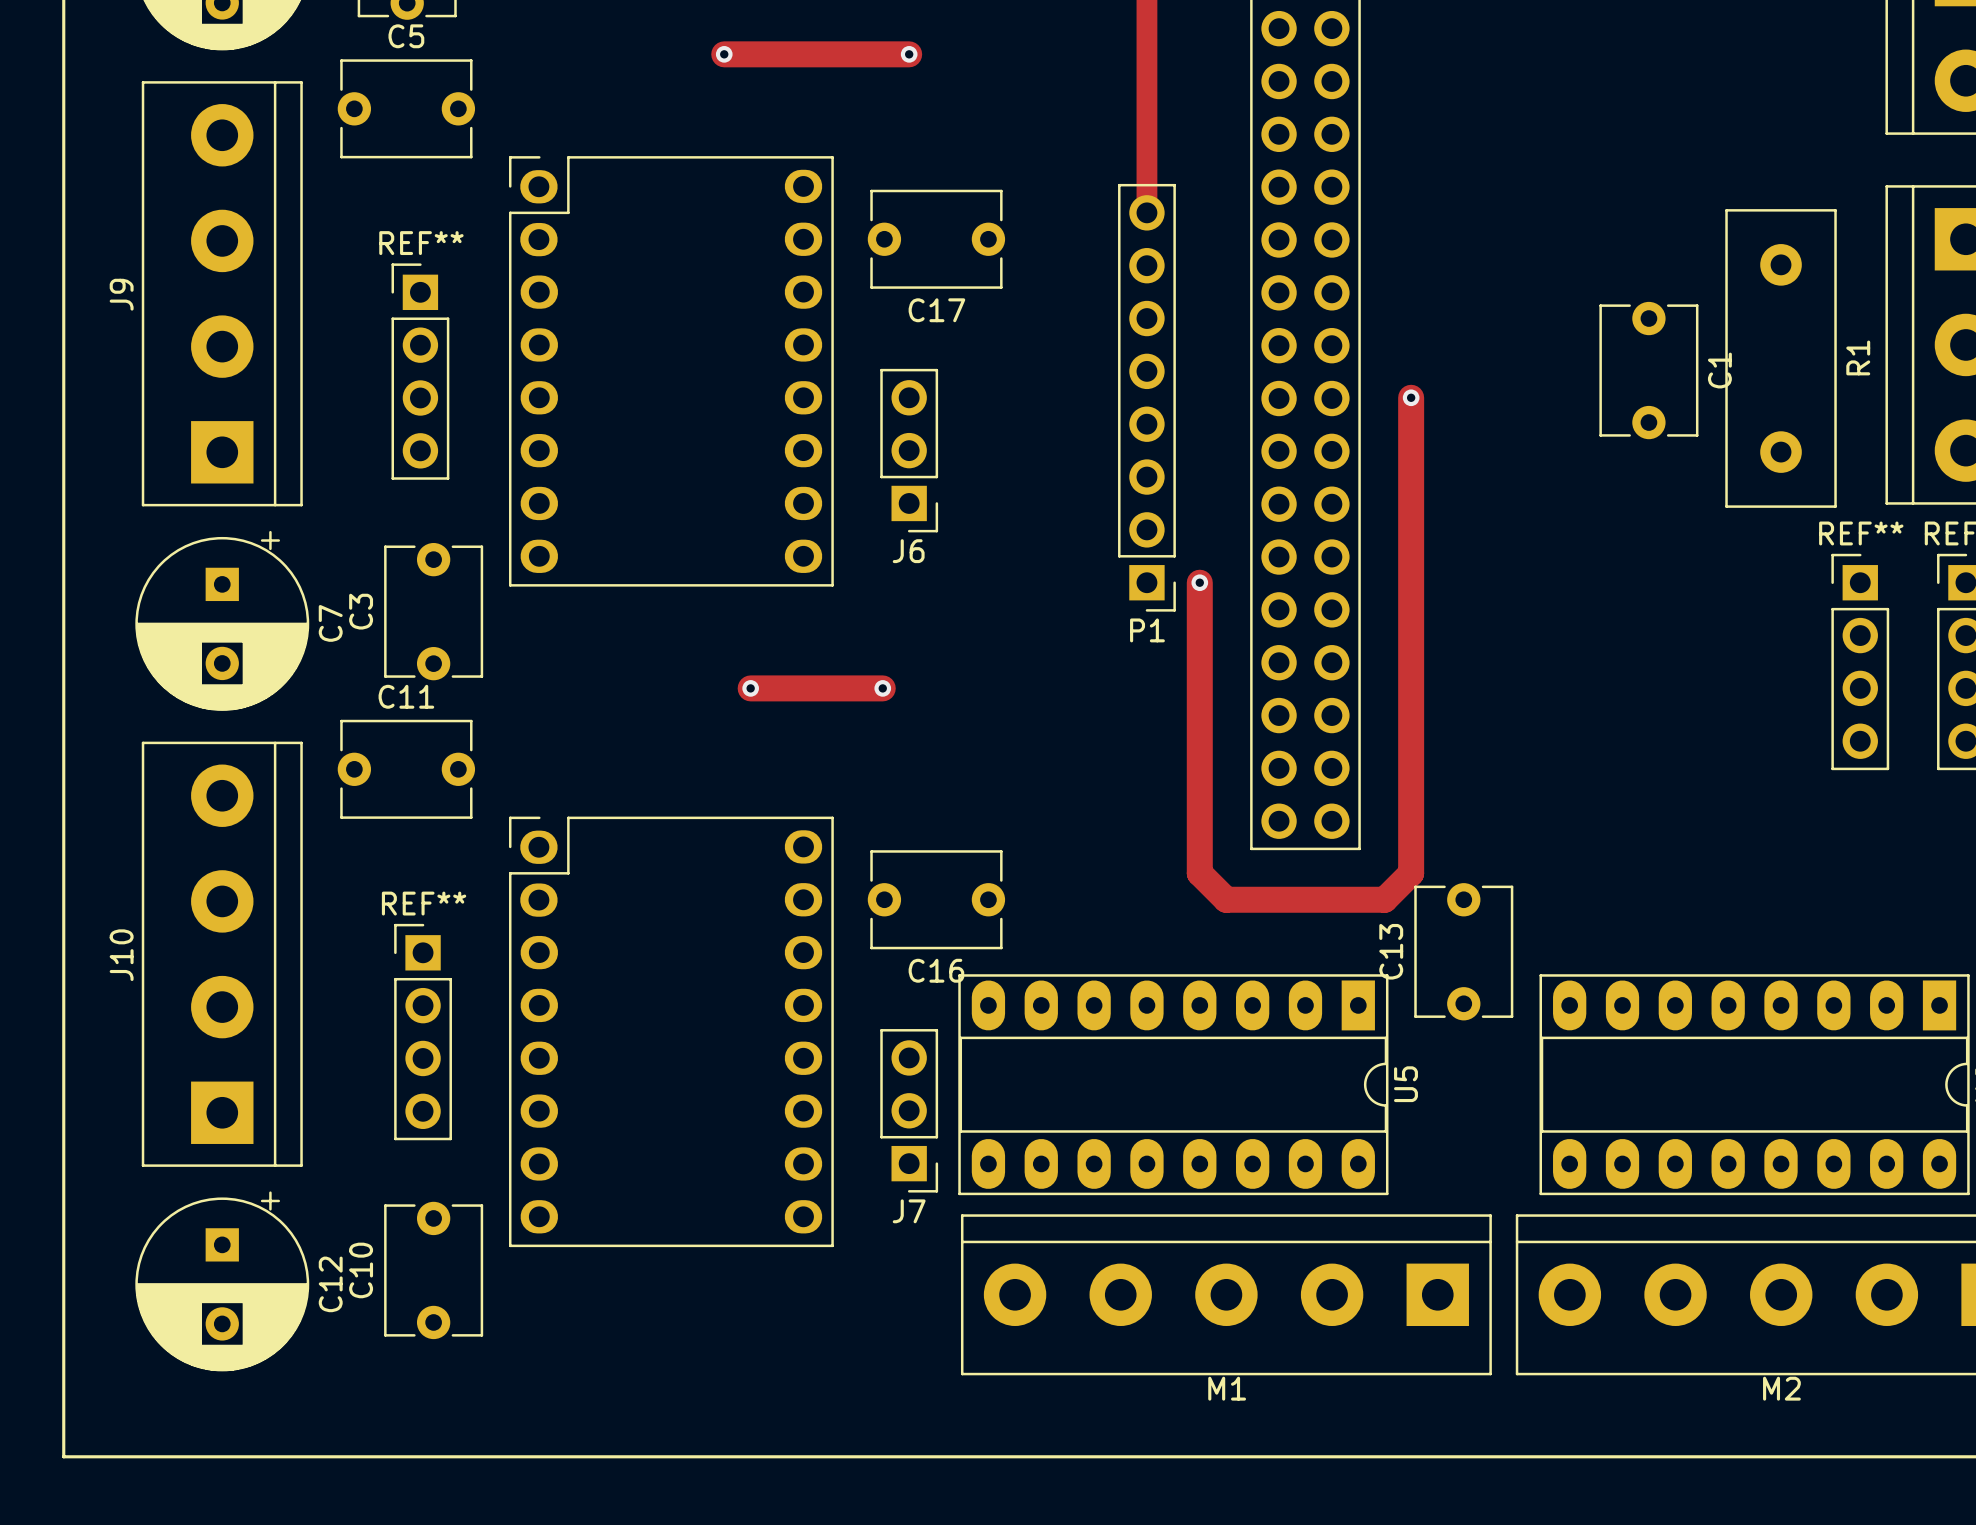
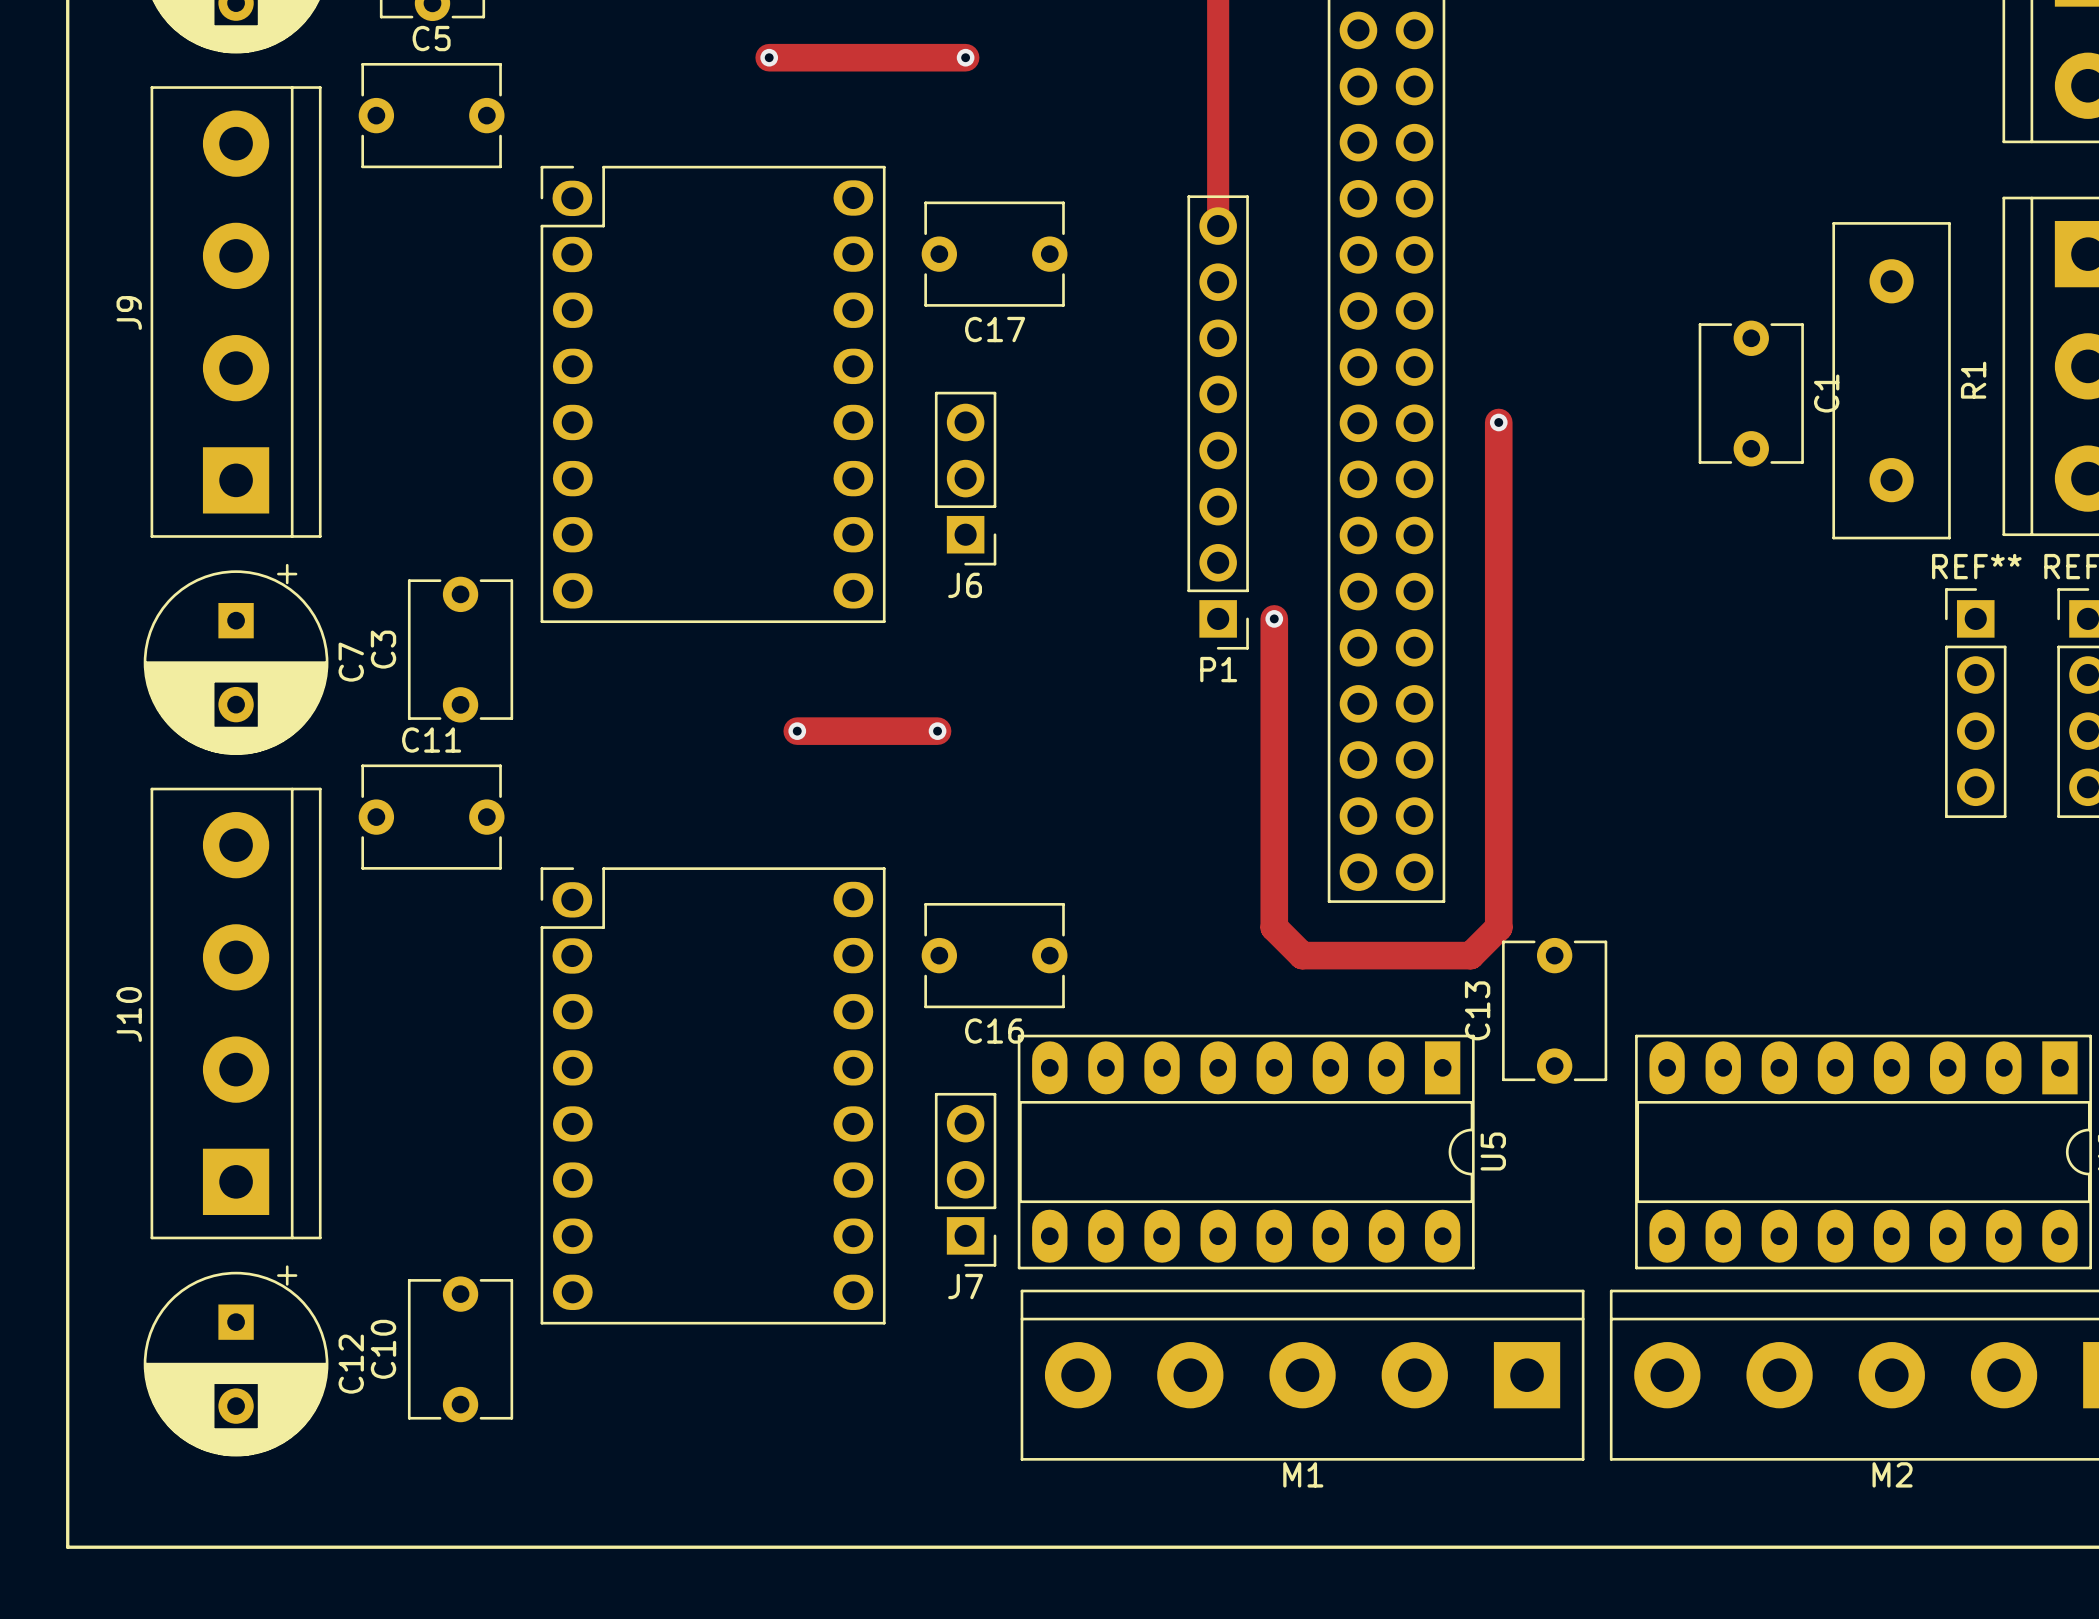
REF**: (420, 371) -> none
REF**: (423, 1032) -> none

